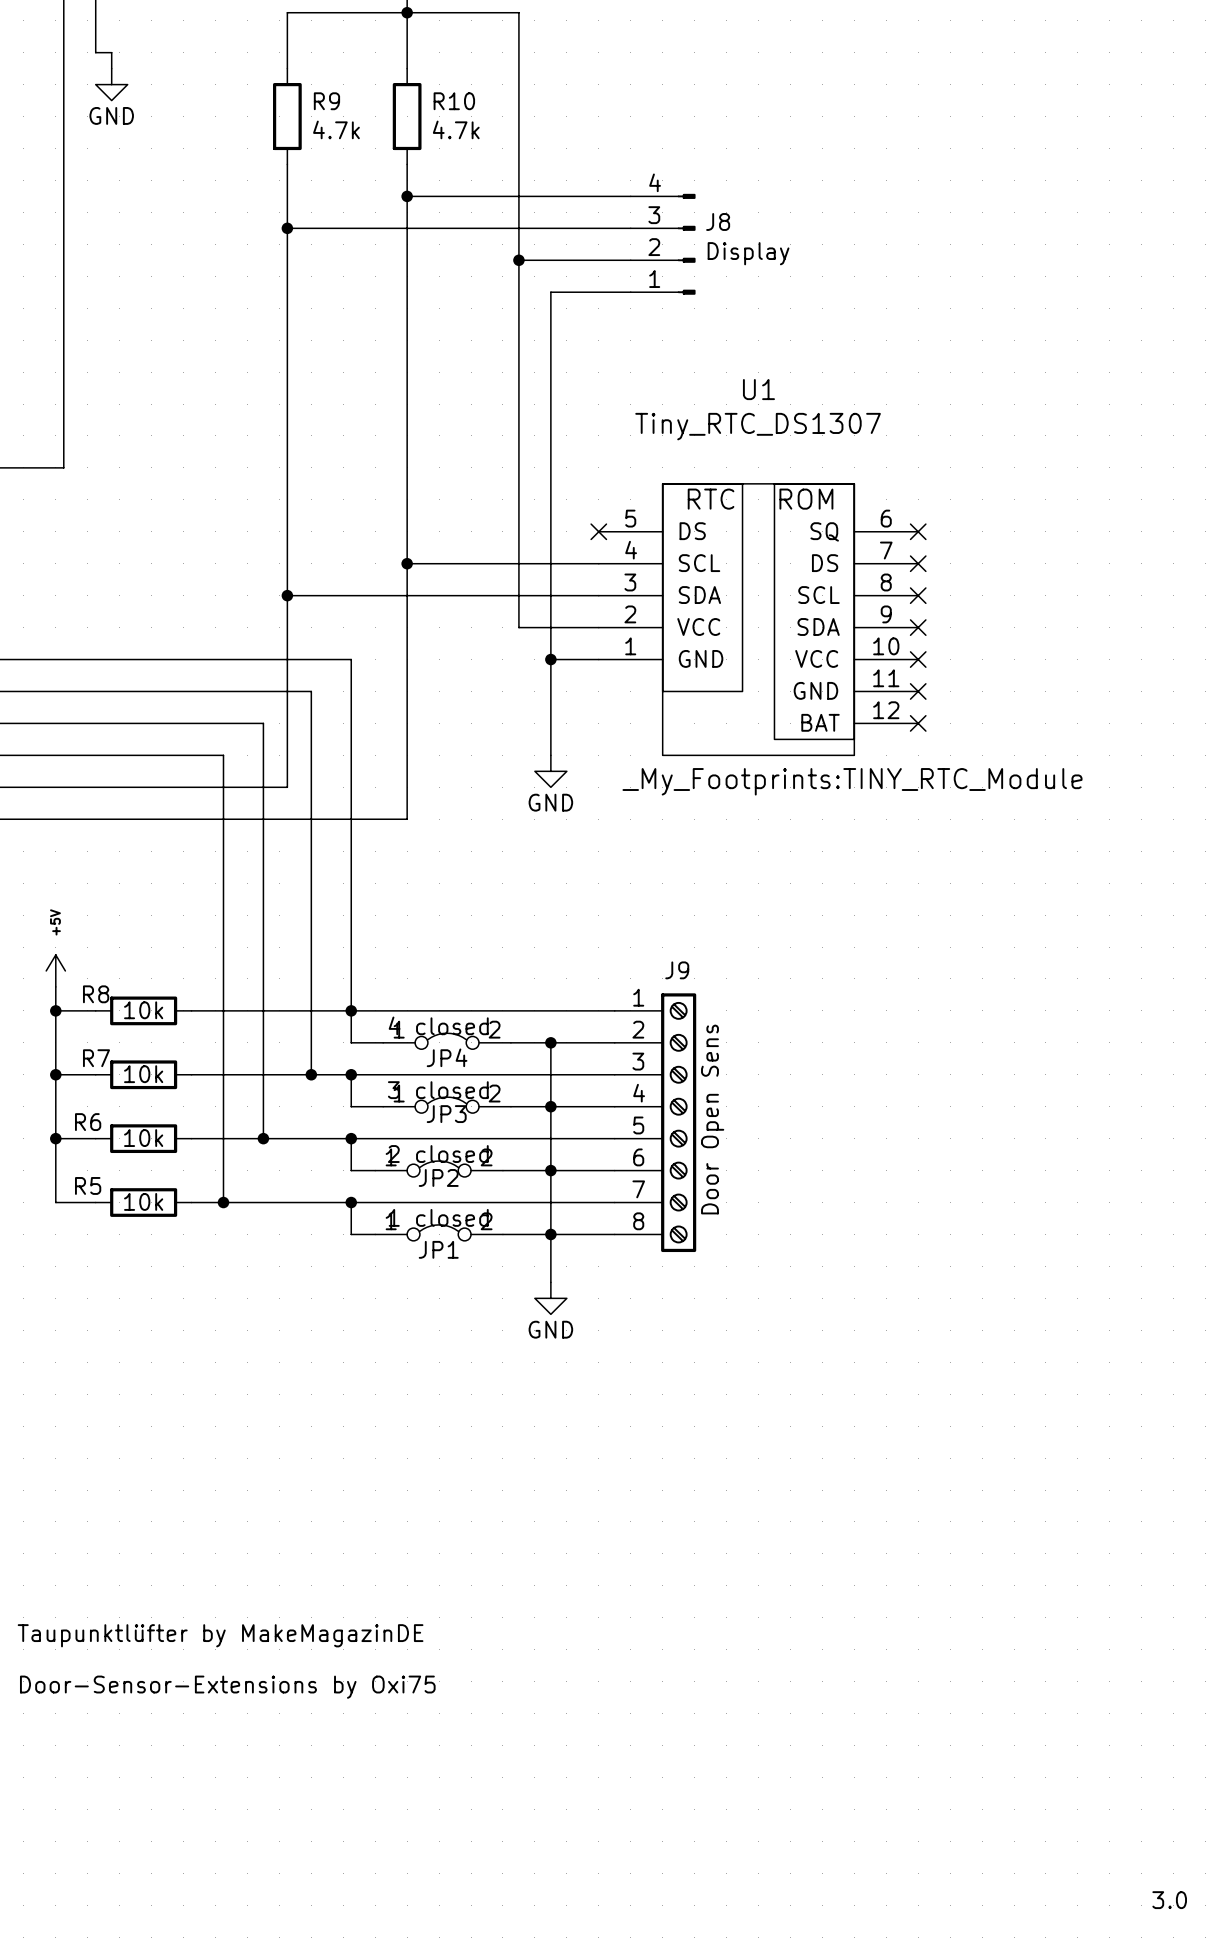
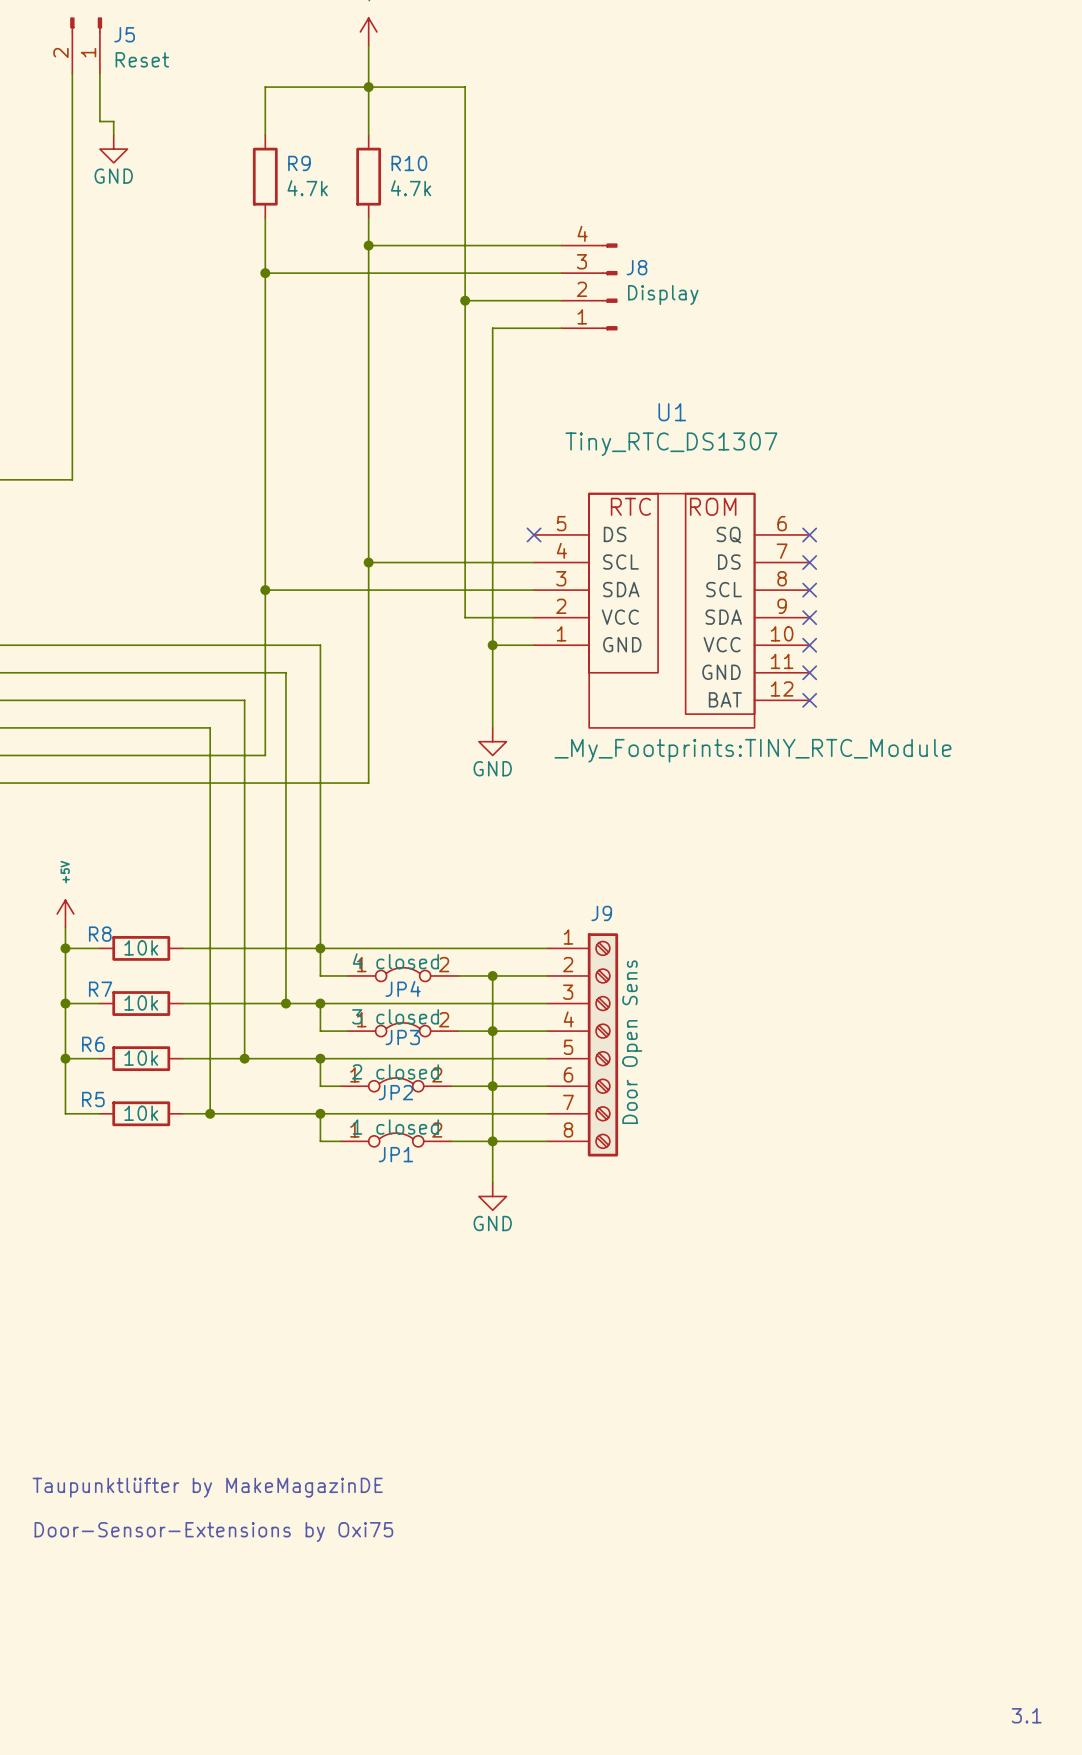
text: 3.0 (1169, 1900) -> 3.1 (1026, 1715)

